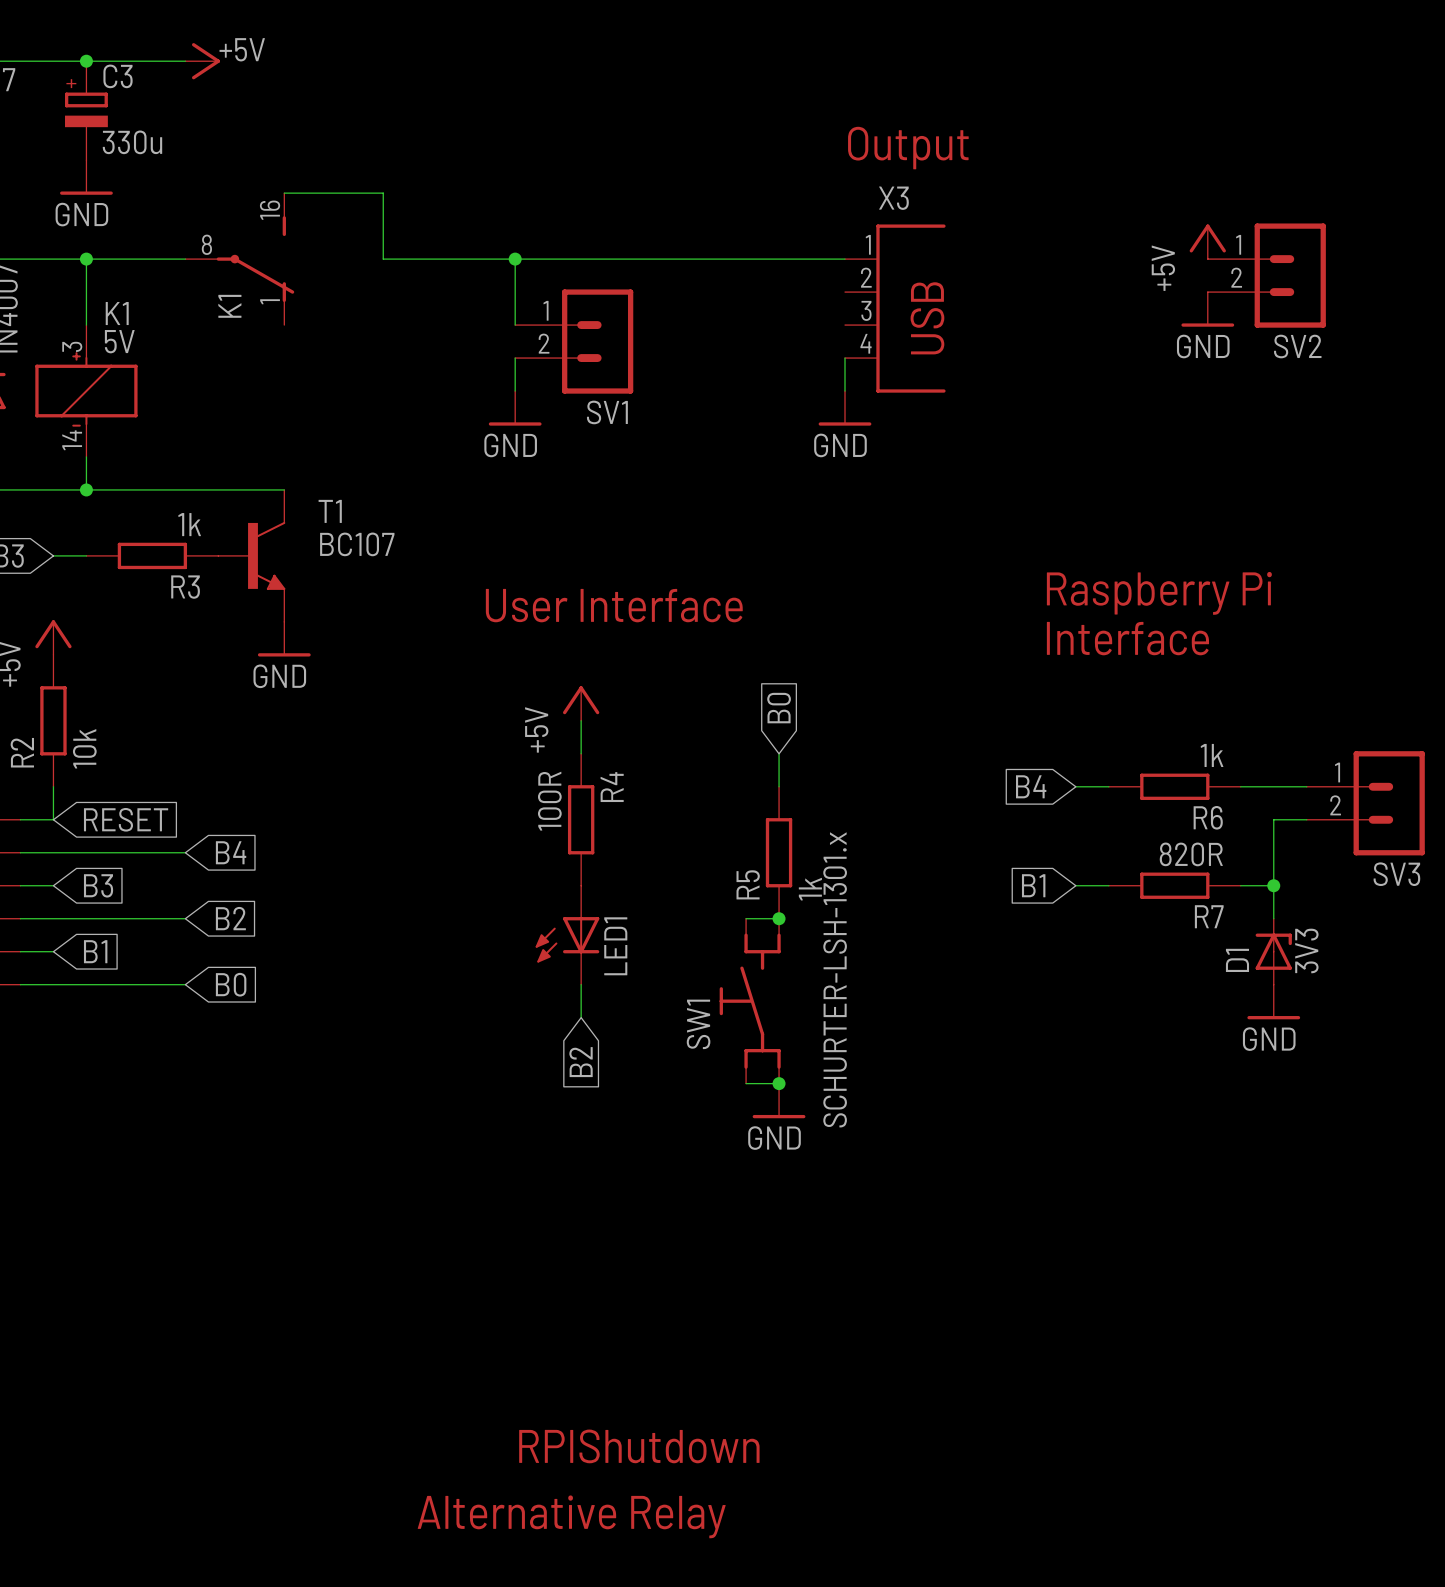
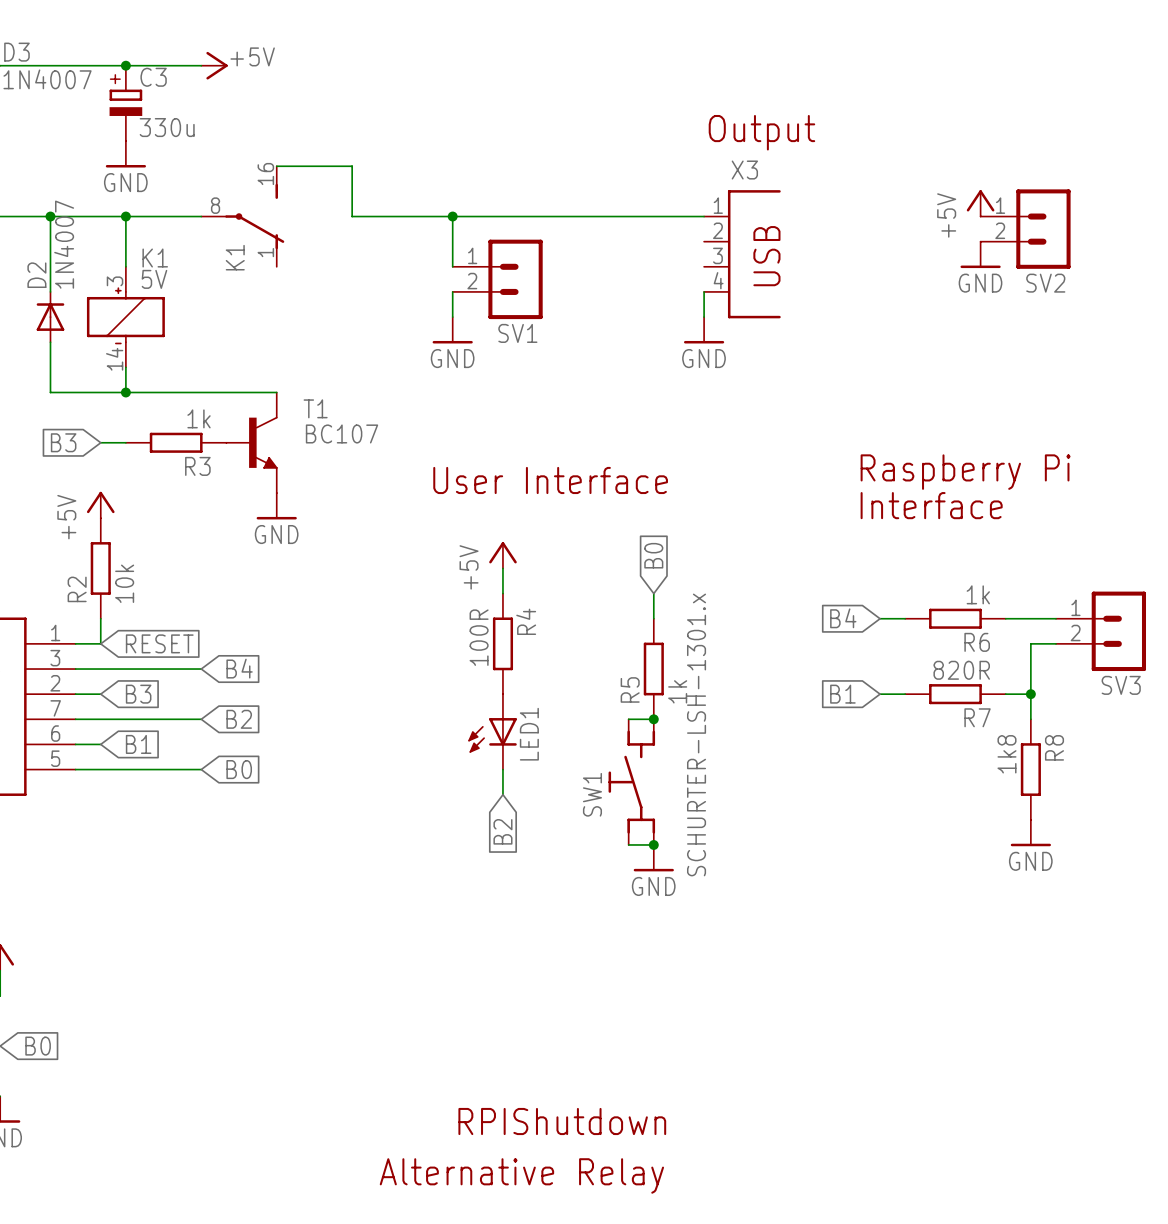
D1: 3V3 (1273, 951) -> none
R8: none -> 1k8 (1030, 769)
power symbol position: GND (1273, 1001) -> GND (1030, 833)

